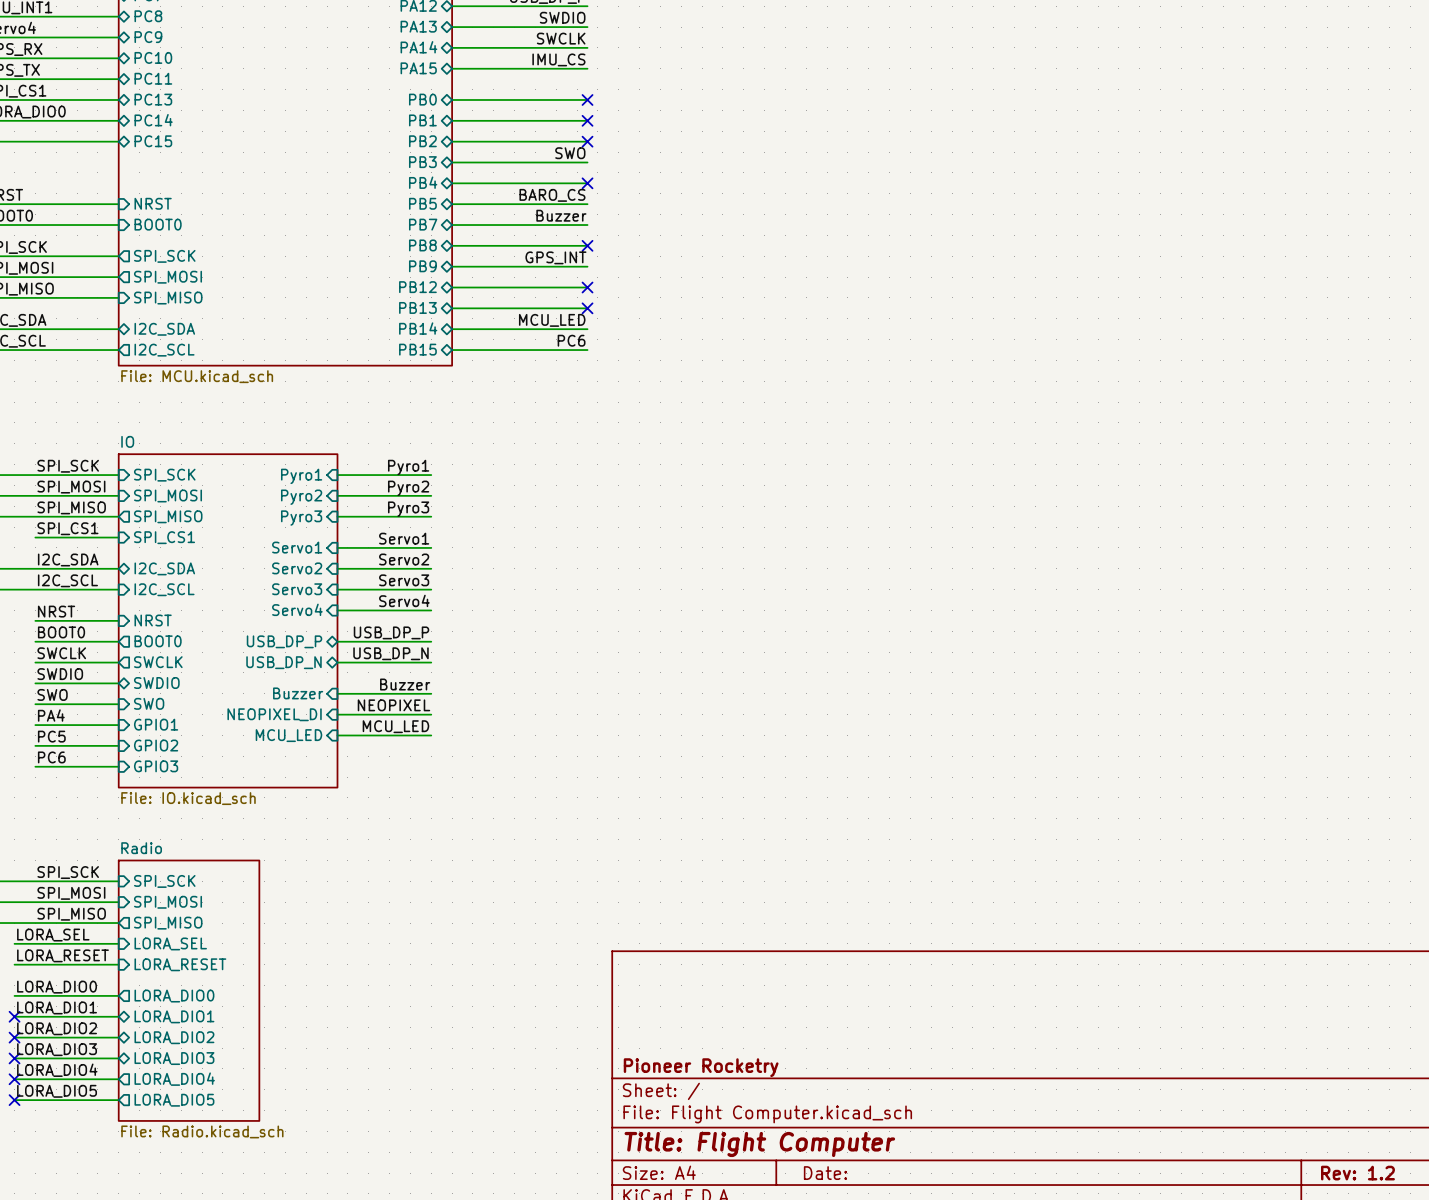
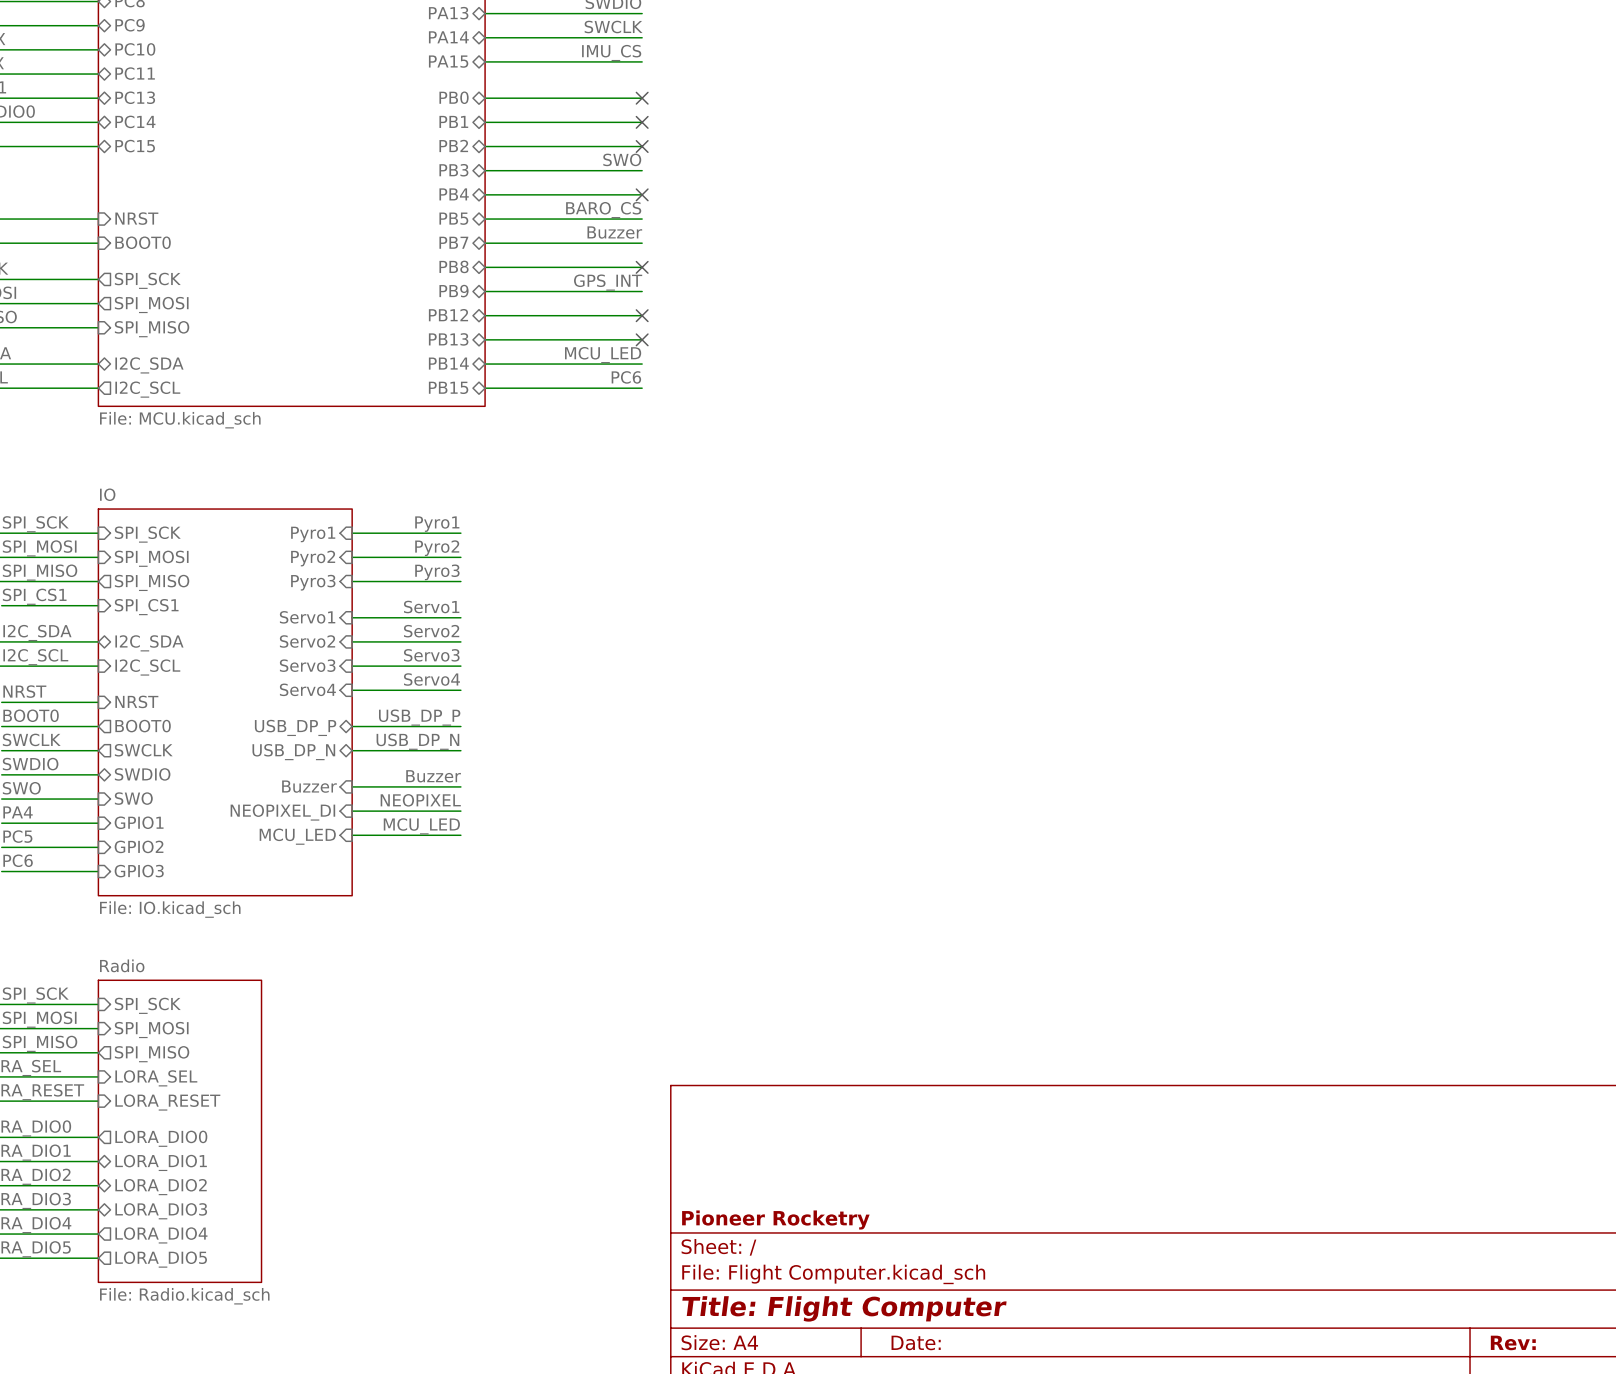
title block: Rev: 1.2 (1357, 1173) -> Rev: (1513, 1342)

